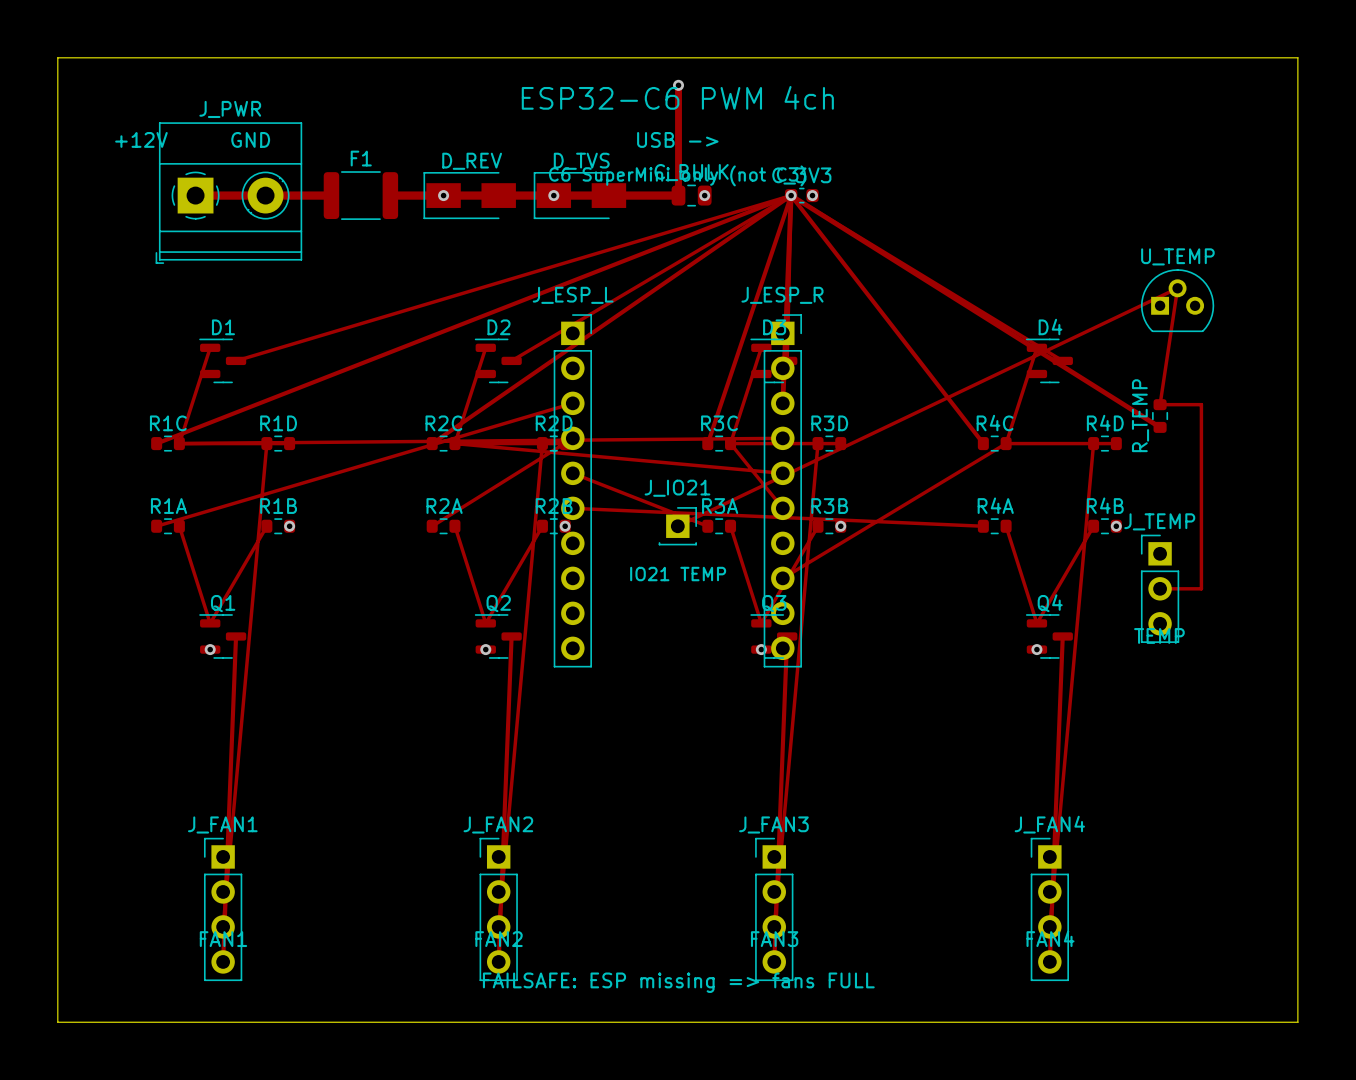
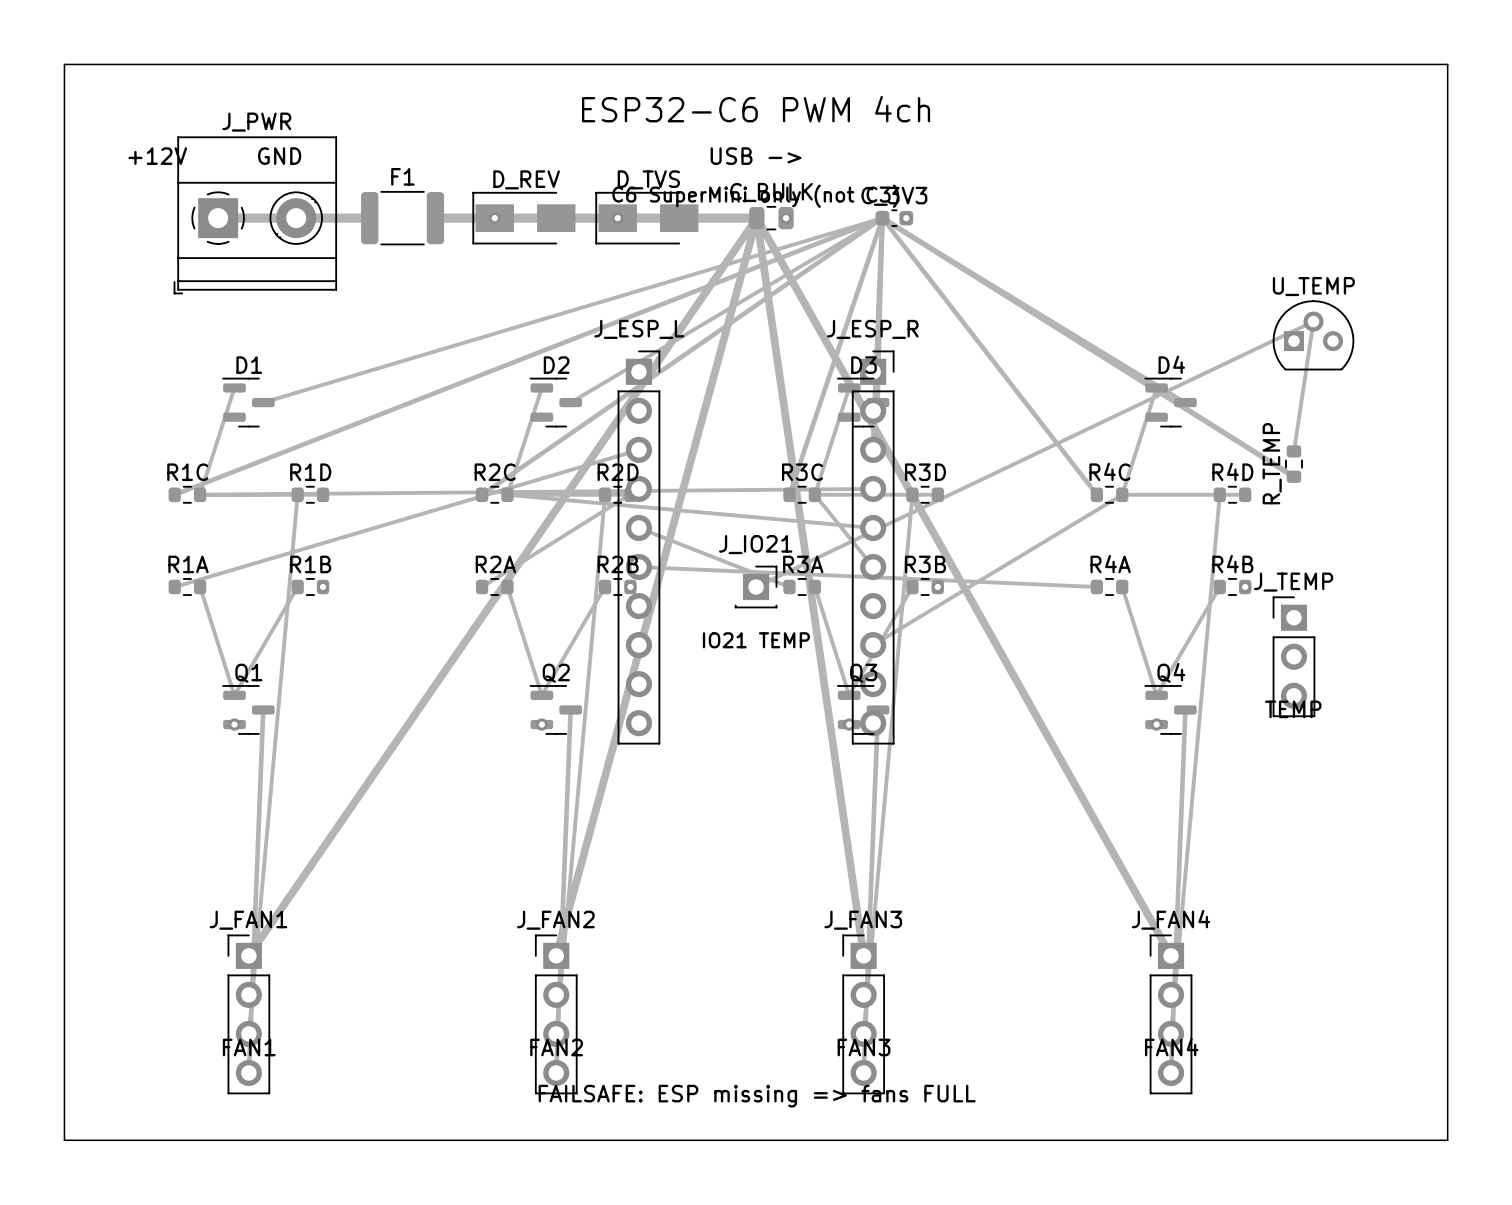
track: (678, 85) (678, 195) -> (863, 955) (756, 218)
via: (678, 85) -> none
track: none -> (756, 218) (556, 955)
track: none -> (756, 218) (248, 955)
track: none -> (756, 218) (1171, 955)
via: (791, 195) -> none
track: (1160, 404) (1201, 404) (1201, 588) (1160, 588) -> none

